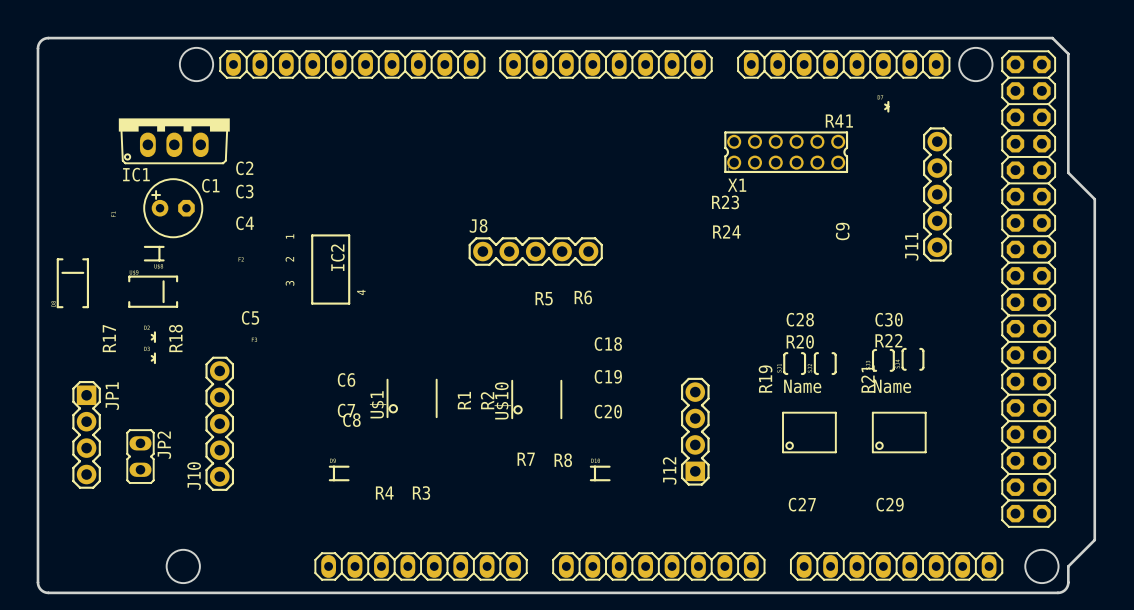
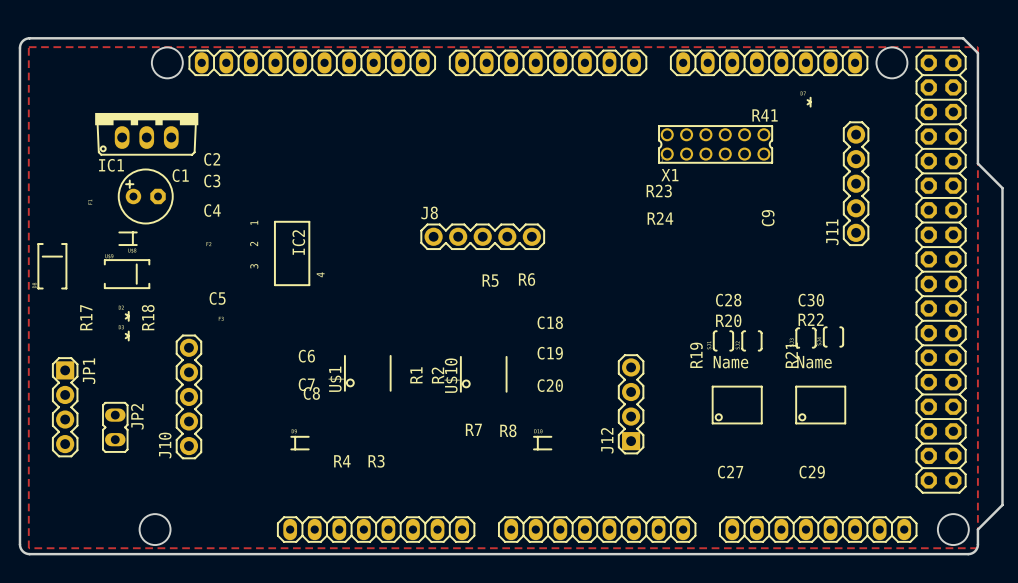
zone outline: none -> (28, 47) (977, 47) (977, 548) (28, 548) (28, 47)

